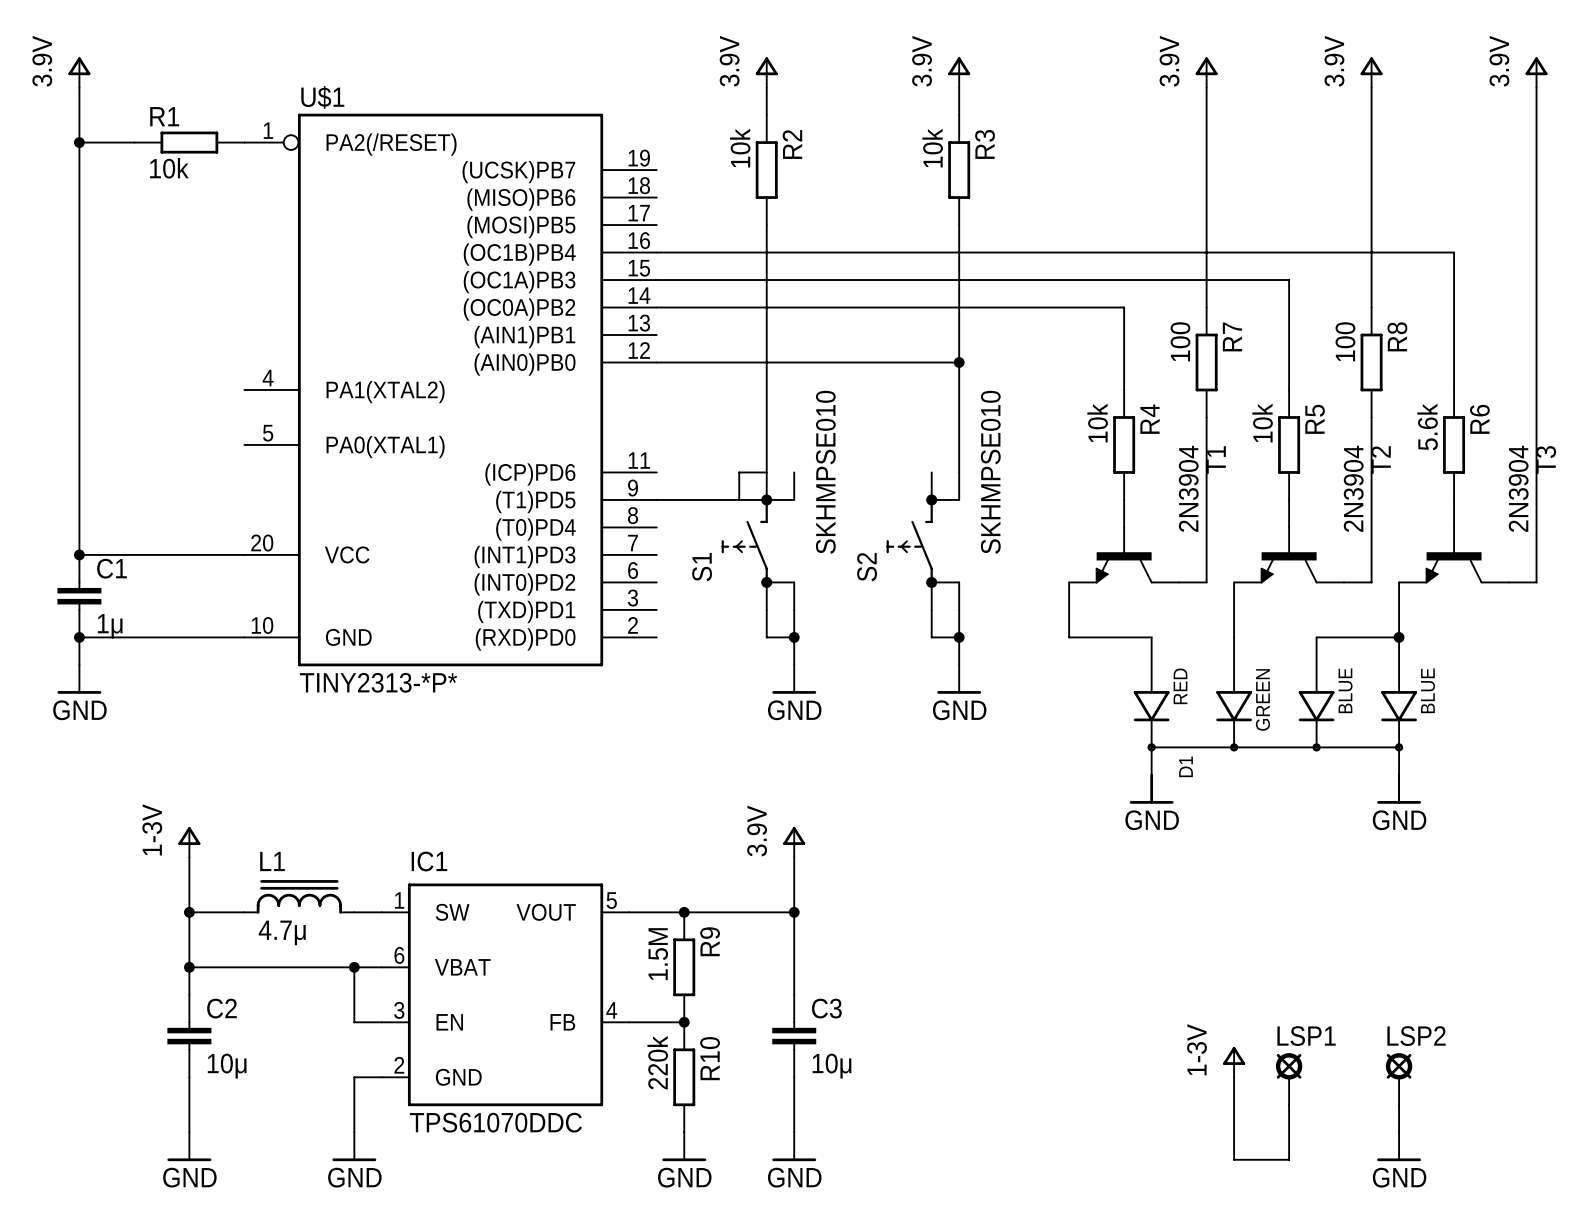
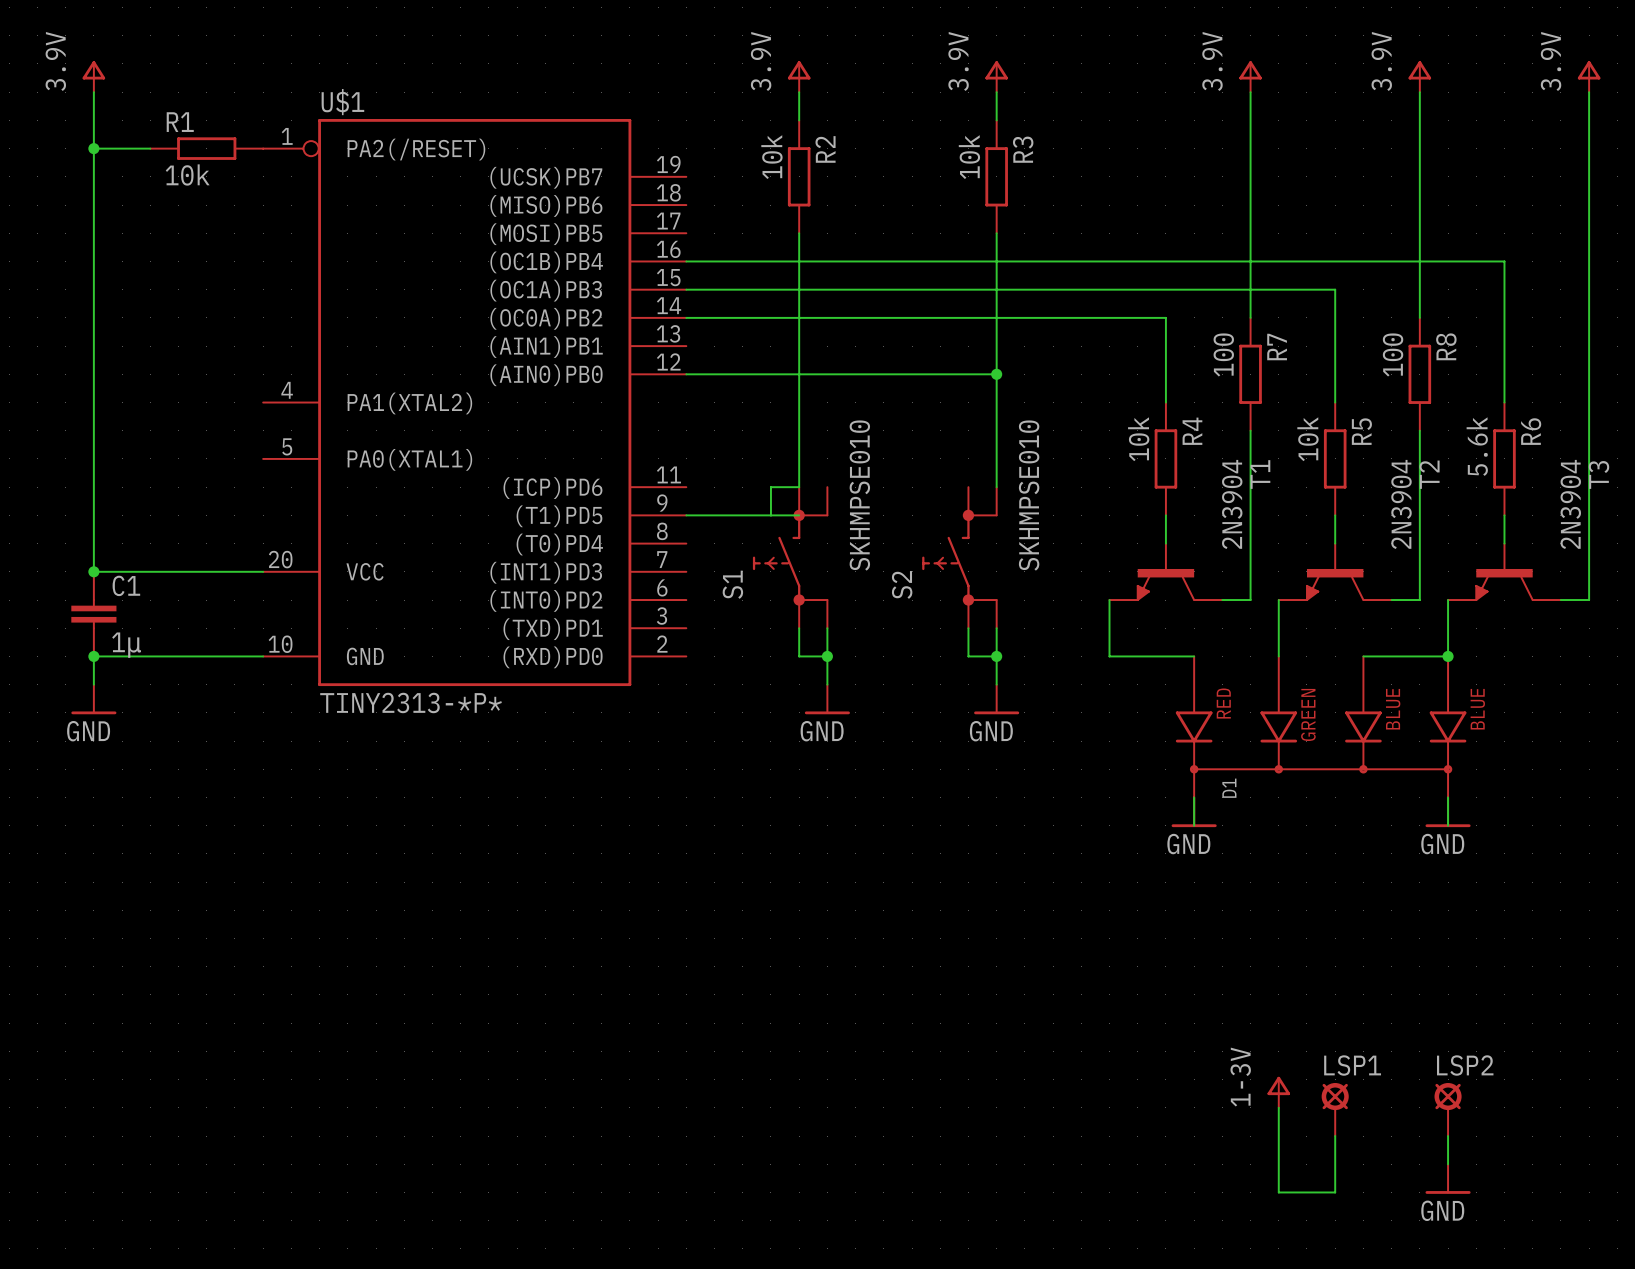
power symbol: 1-3V (189, 842) -> none
power symbol: 3.9V (794, 842) -> none
wire: (189, 857) (189, 994) -> none
wire: (794, 857) (794, 994) -> none
L1: 4.7μ (299, 896) -> none
wire: (189, 912) (244, 912) -> none
junction: (189, 912) -> none
wire: (354, 912) (381, 912) -> none
wire: (629, 912) (794, 912) -> none
junction: (684, 912) -> none
junction: (794, 912) -> none
wire: (189, 967) (381, 967) -> none
junction: (189, 967) -> none
wire: (354, 967) (354, 1022) (381, 1022) -> none
junction: (354, 967) -> none
R9: 1.5M (684, 967) -> none
IC1: TPS61070DDC (505, 994) -> none
wire: (629, 1022) (684, 1022) -> none
junction: (684, 1022) -> none
C2: 10μ (189, 1036) -> none
C3: 10μ (794, 1036) -> none
wire: (189, 1077) (189, 1132) -> none
wire: (381, 1077) (354, 1077) (354, 1132) -> none
R10: 220k (684, 1077) -> none
wire: (794, 1077) (794, 1132) -> none
power symbol: GND (189, 1146) -> none
power symbol: GND (354, 1146) -> none
power symbol: GND (684, 1146) -> none
power symbol: GND (794, 1146) -> none

